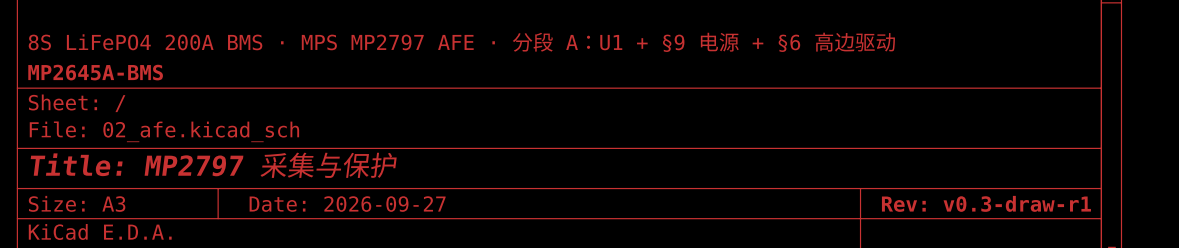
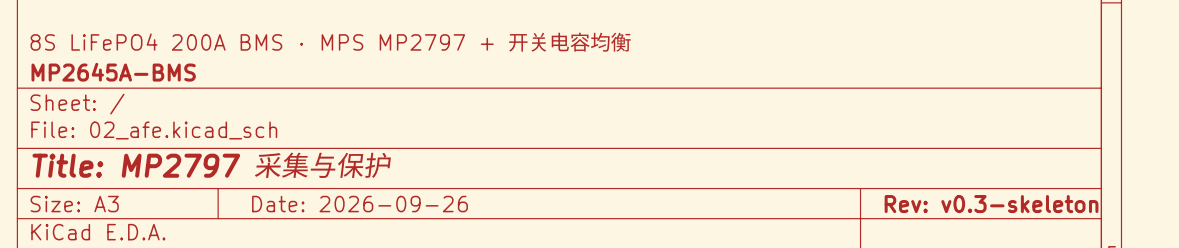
title block: 8S LiFePO4 200A BMS · MPS MP2797 AFE · 分段 A：U1 + §9 电源 + §6 高边驱动 (461, 42) -> 8S LiFePO4 200A BMS · MPS MP2797 + 开关电容均衡 (330, 42)
title block: Rev: v0.3-draw-r1 (986, 203) -> Rev: v0.3-skeleton (991, 204)
title block: Date: 2026-09-27 (347, 204) -> Date: 2026-09-26 (360, 204)

